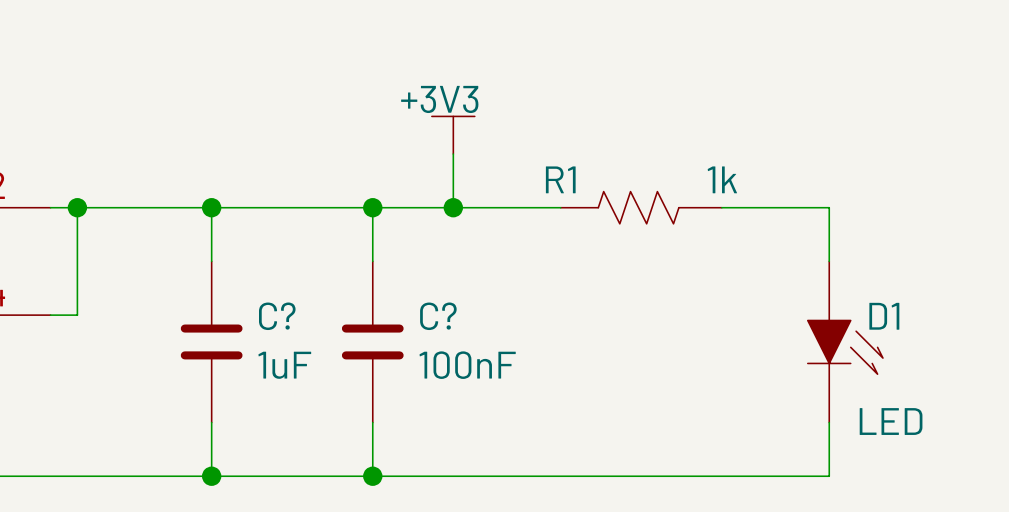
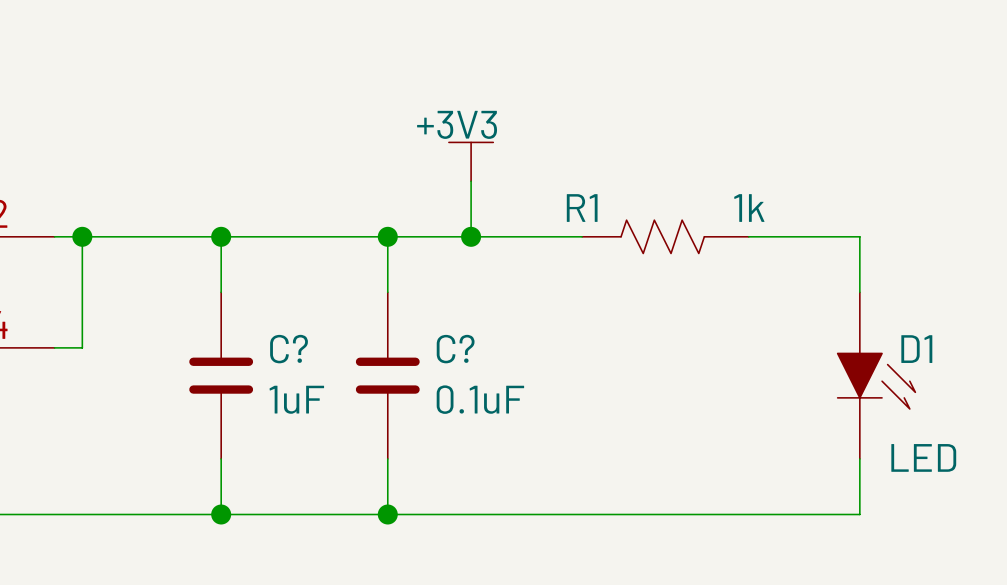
C? value: 100nF (467, 365) -> 0.1uF (480, 399)

